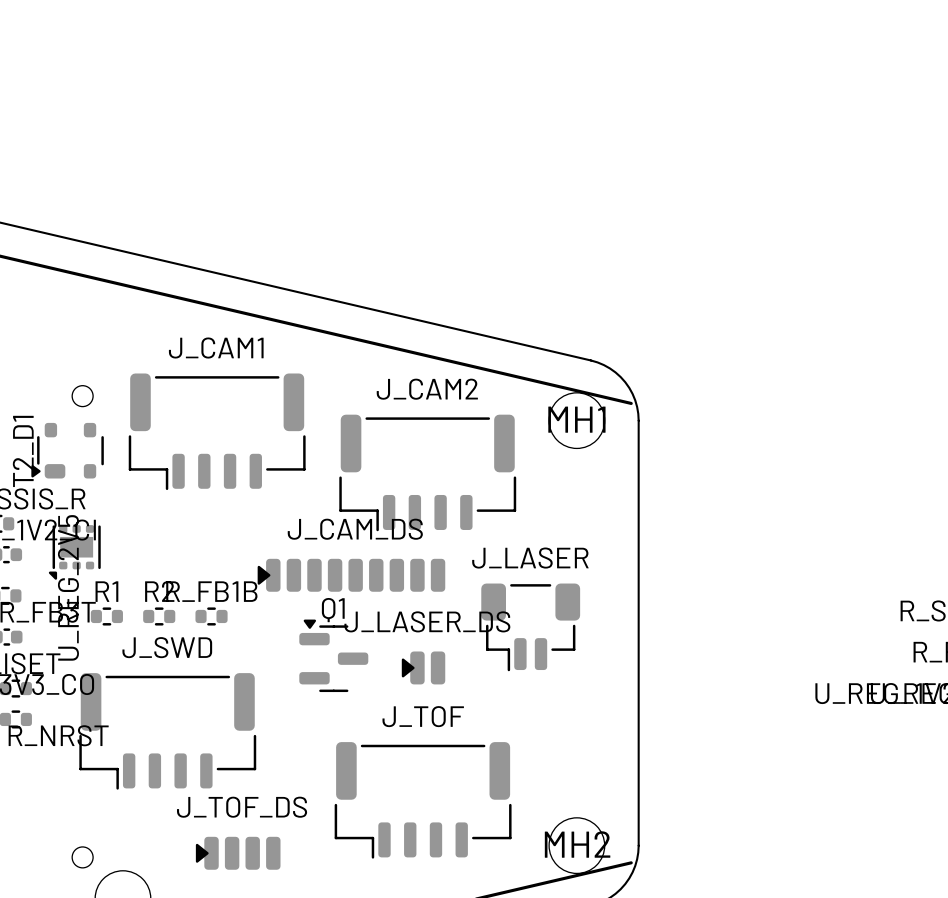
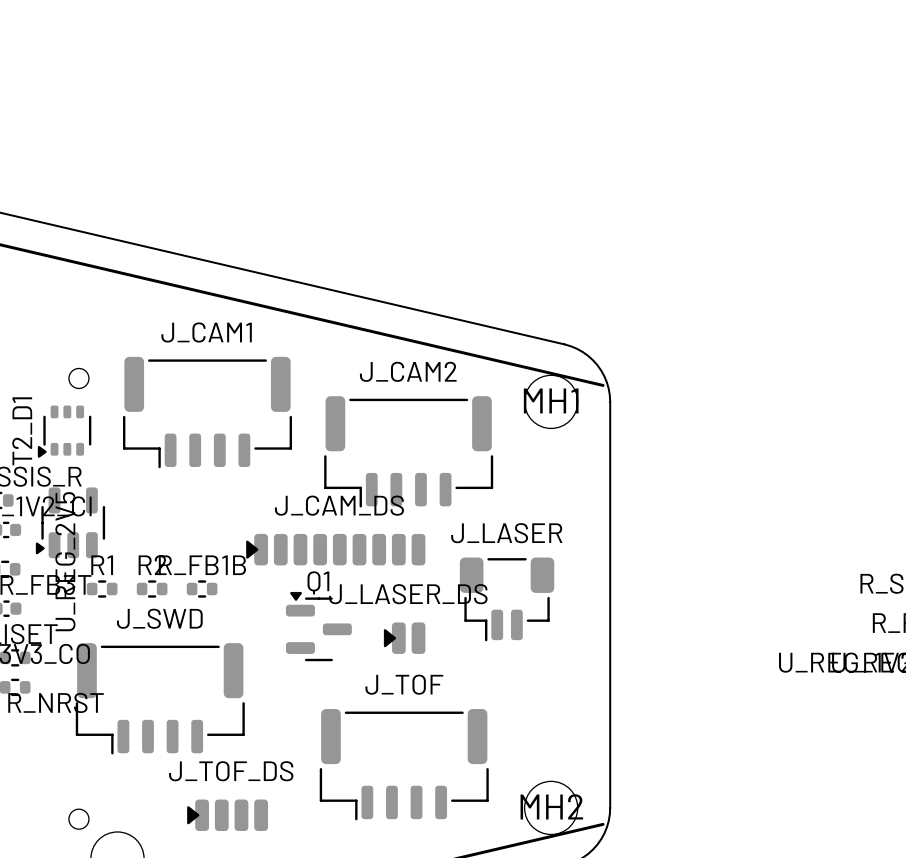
T2_D1 footprint: [31, 422, 104, 479] -> [37, 405, 92, 458]
U_REG_2V5 footprint: [48, 525, 101, 580] -> [35, 487, 106, 559]

